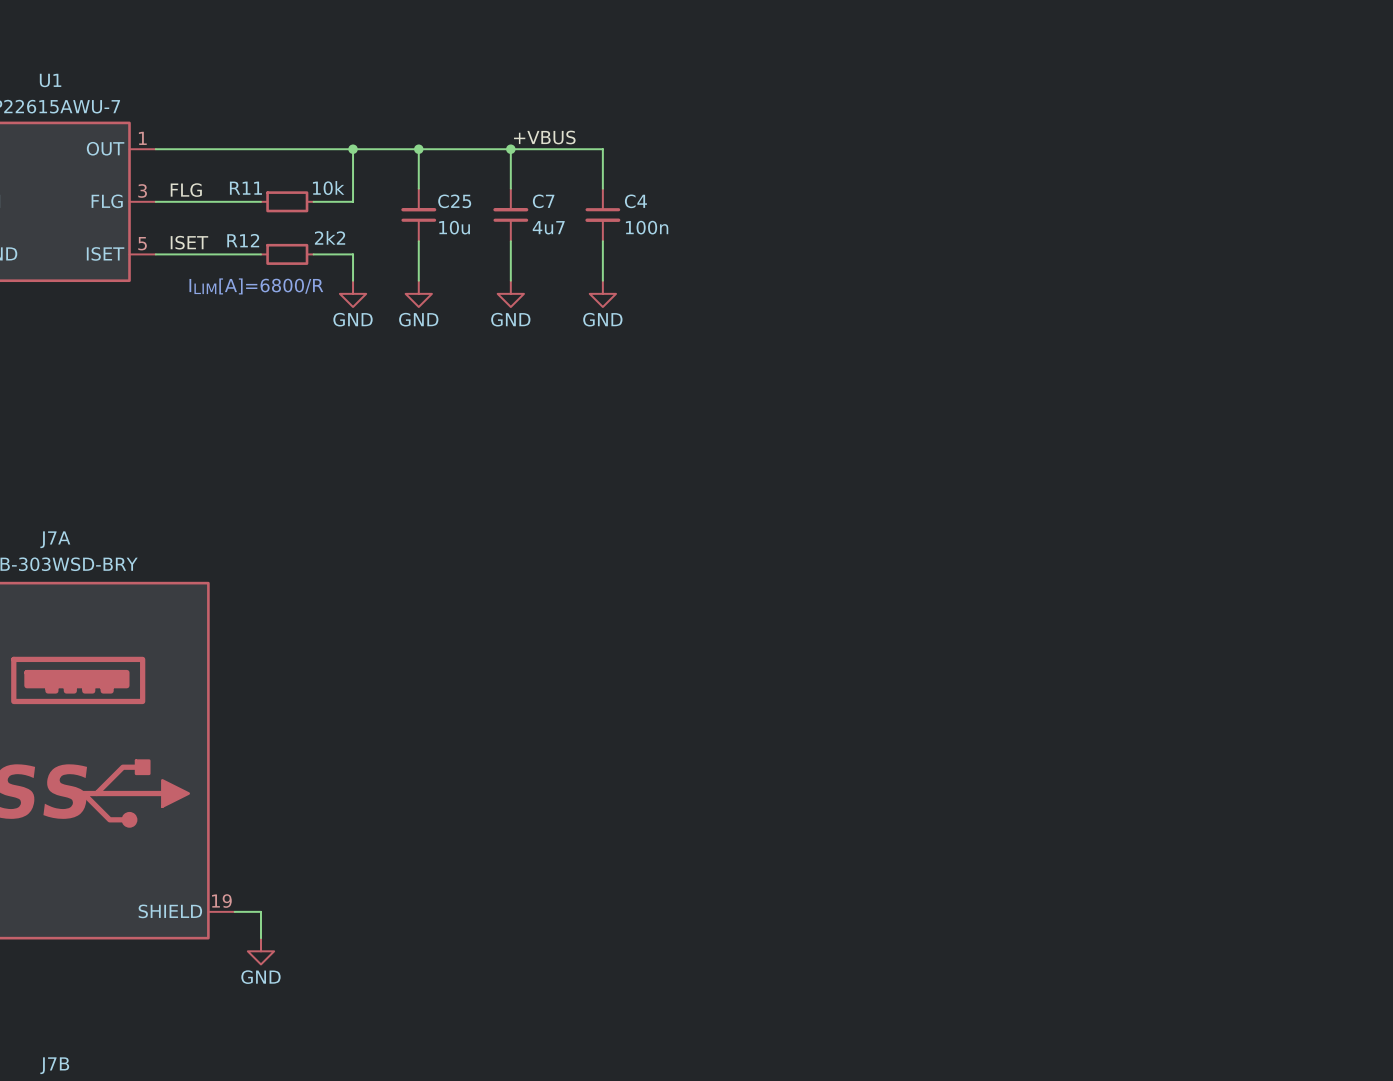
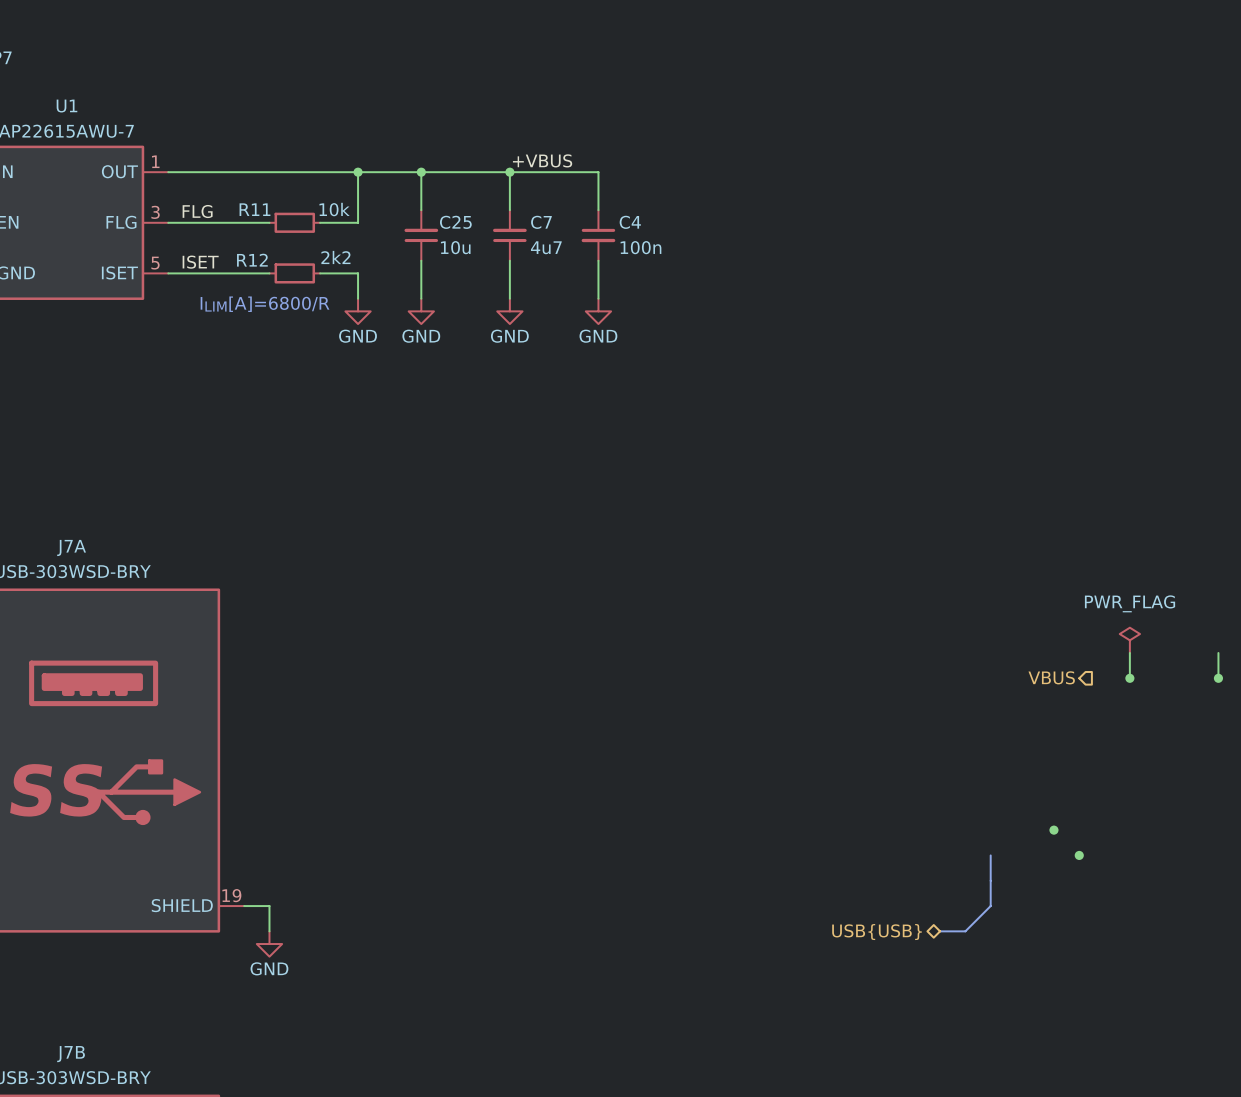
power symbol: none -> PWR_FLAG (1129, 640)
wire: none -> (1129, 652) (1129, 678)
wire: none -> (1218, 652) (1218, 678)
hierarchical label: none -> VBUS (1051, 677)
junction: none -> (1129, 678)
junction: none -> (1218, 678)
junction: none -> (1053, 830)
bus: none -> (990, 855) (990, 906) (965, 931) (940, 931)
junction: none -> (1079, 855)
hierarchical label: none -> USB{USB} (877, 932)

